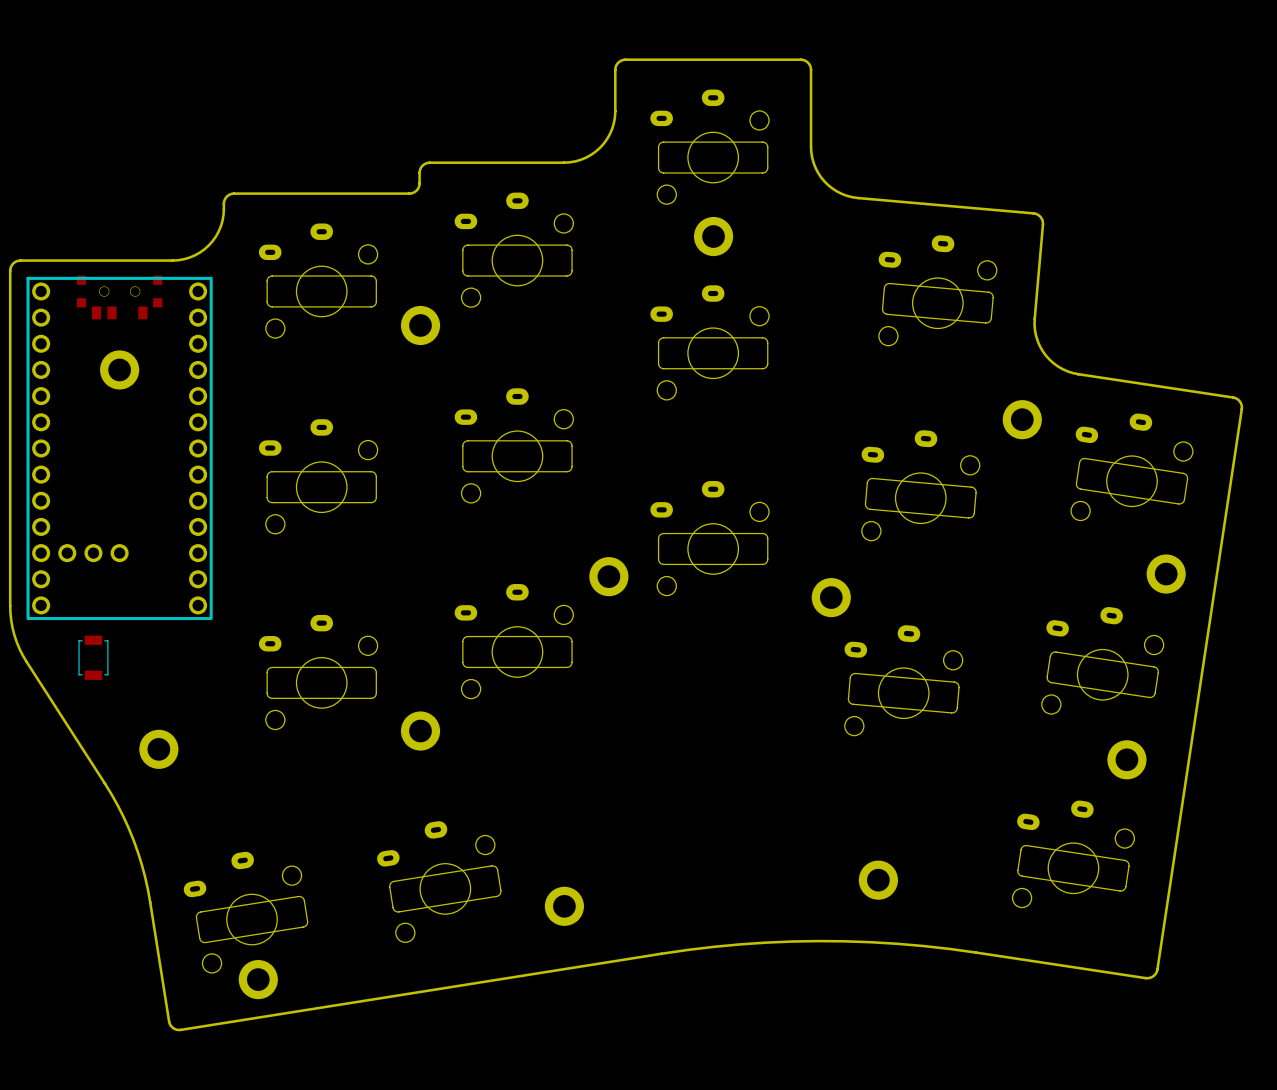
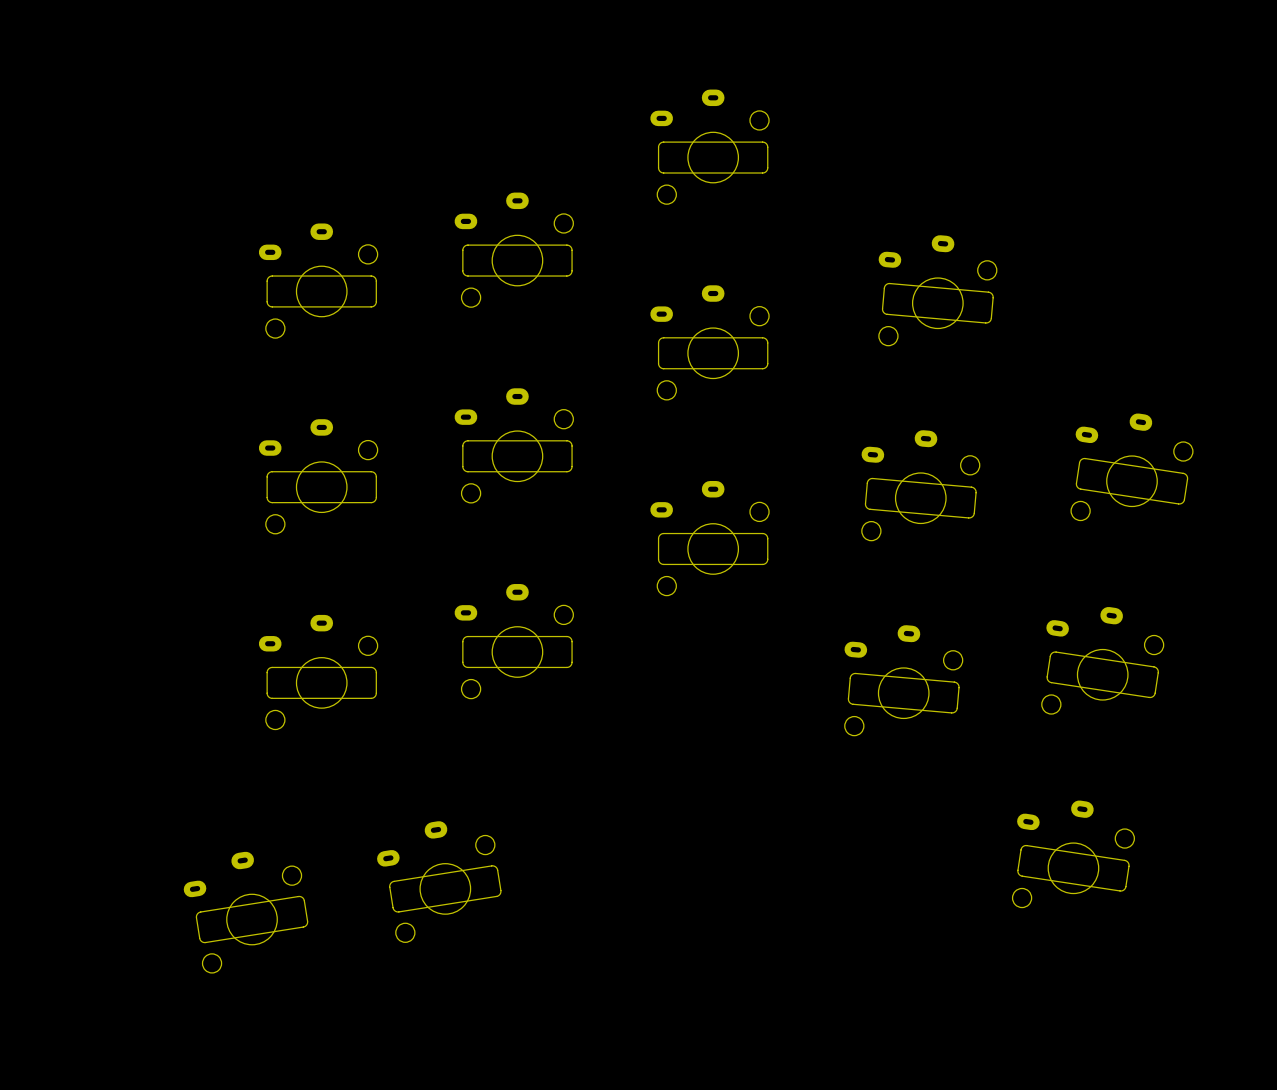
board edge: (625, 59) (805, 61) (811, 69) (812, 157) (818, 172) (832, 188) (847, 195) (858, 198) (1033, 213) (1040, 217) (1042, 224) (1034, 329) (1042, 350) (1053, 363) (1072, 373) (1233, 397) (1240, 402) (1241, 409) (1156, 972) (1152, 976) (1145, 978) (976, 952) (897, 943) (845, 941) (766, 942) (661, 953) (180, 1029) (175, 1029) (169, 1021) (145, 877) (128, 828) (111, 794) (22, 655) (12, 627) (10, 606) (11, 266) (15, 261) (20, 260) (172, 260) (189, 257) (204, 249) (215, 236) (222, 220) (224, 199) (232, 193) (410, 193) (418, 188) (420, 169) (428, 162) (563, 162) (580, 159) (600, 147) (610, 133) (614, 116) (615, 67) (619, 61) (625, 59) -> none
part: (713, 236) -> none
part: (119, 297) -> none
part: (420, 325) -> none
part: (119, 369) -> none
part: (1022, 419) -> none
part: (119, 448) -> none
part: (1166, 574) -> none
part: (608, 576) -> none
part: (831, 597) -> none
part: (93, 657) -> none
part: (420, 731) -> none
part: (158, 749) -> none
part: (1126, 759) -> none
part: (878, 880) -> none
part: (564, 906) -> none
part: (258, 979) -> none

